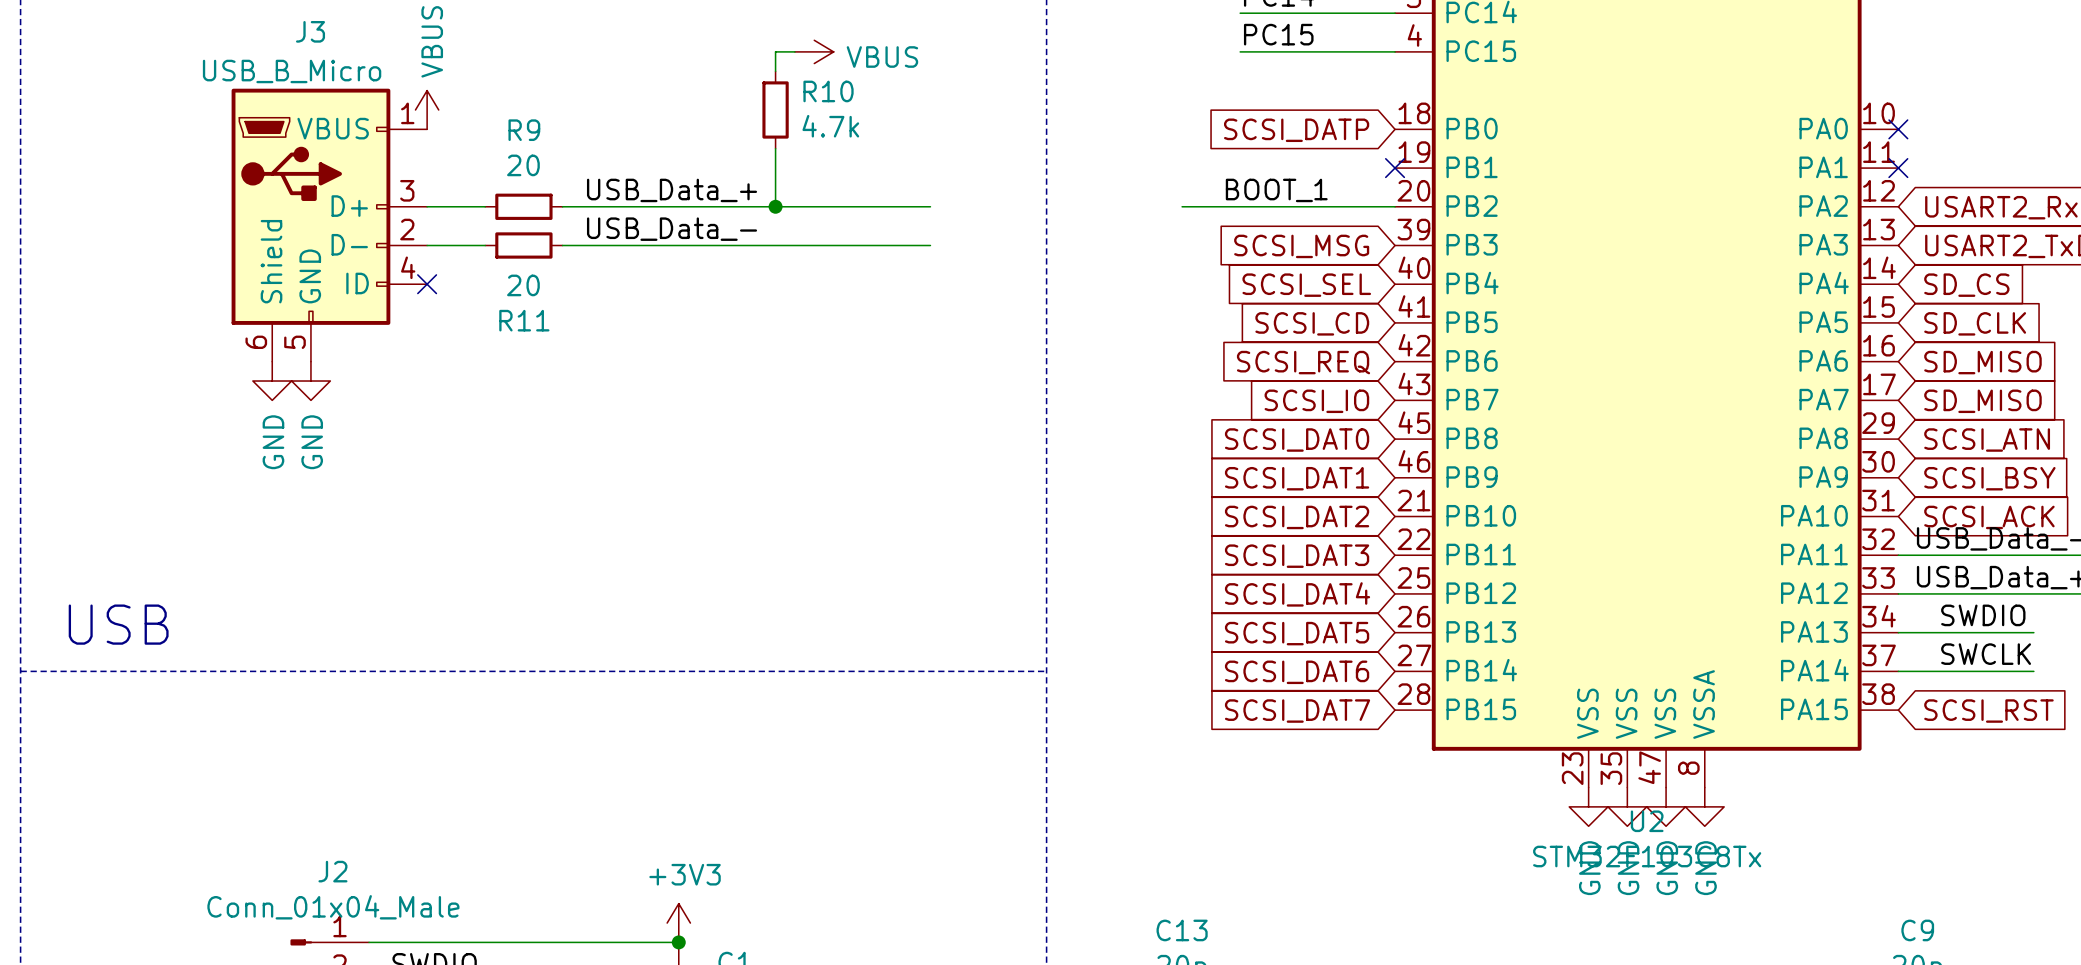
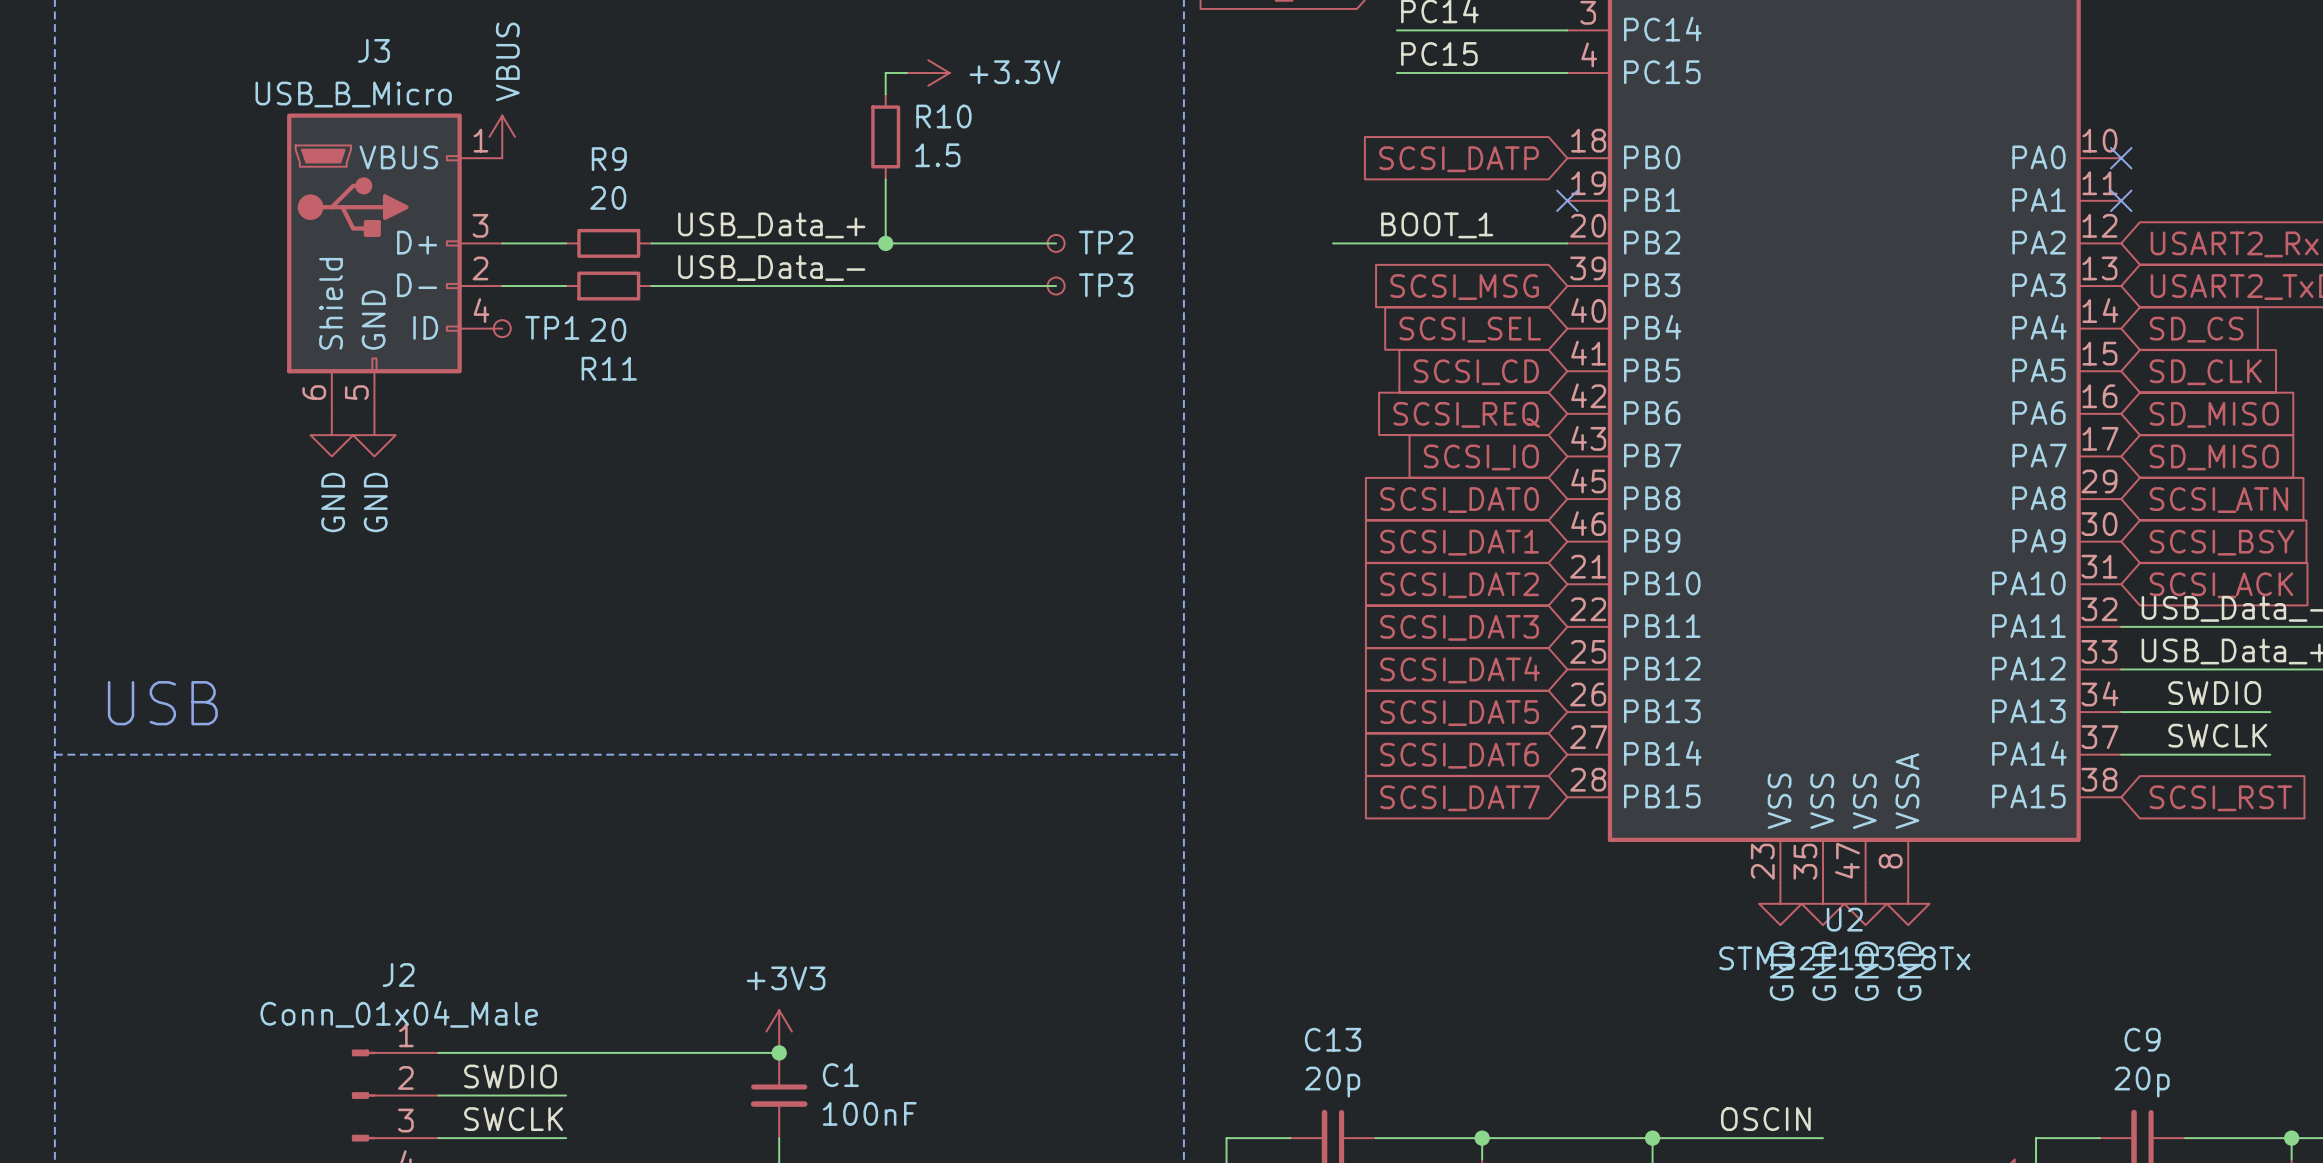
power symbol: VBUS (814, 51) -> +3.3V (928, 73)
R10 value: 4.7k (830, 126) -> 1.5 (937, 155)
TP2: none -> (1056, 243)
TP3: none -> (1056, 286)
TP1: none -> (502, 328)
no-connect mark: (427, 284) -> none

